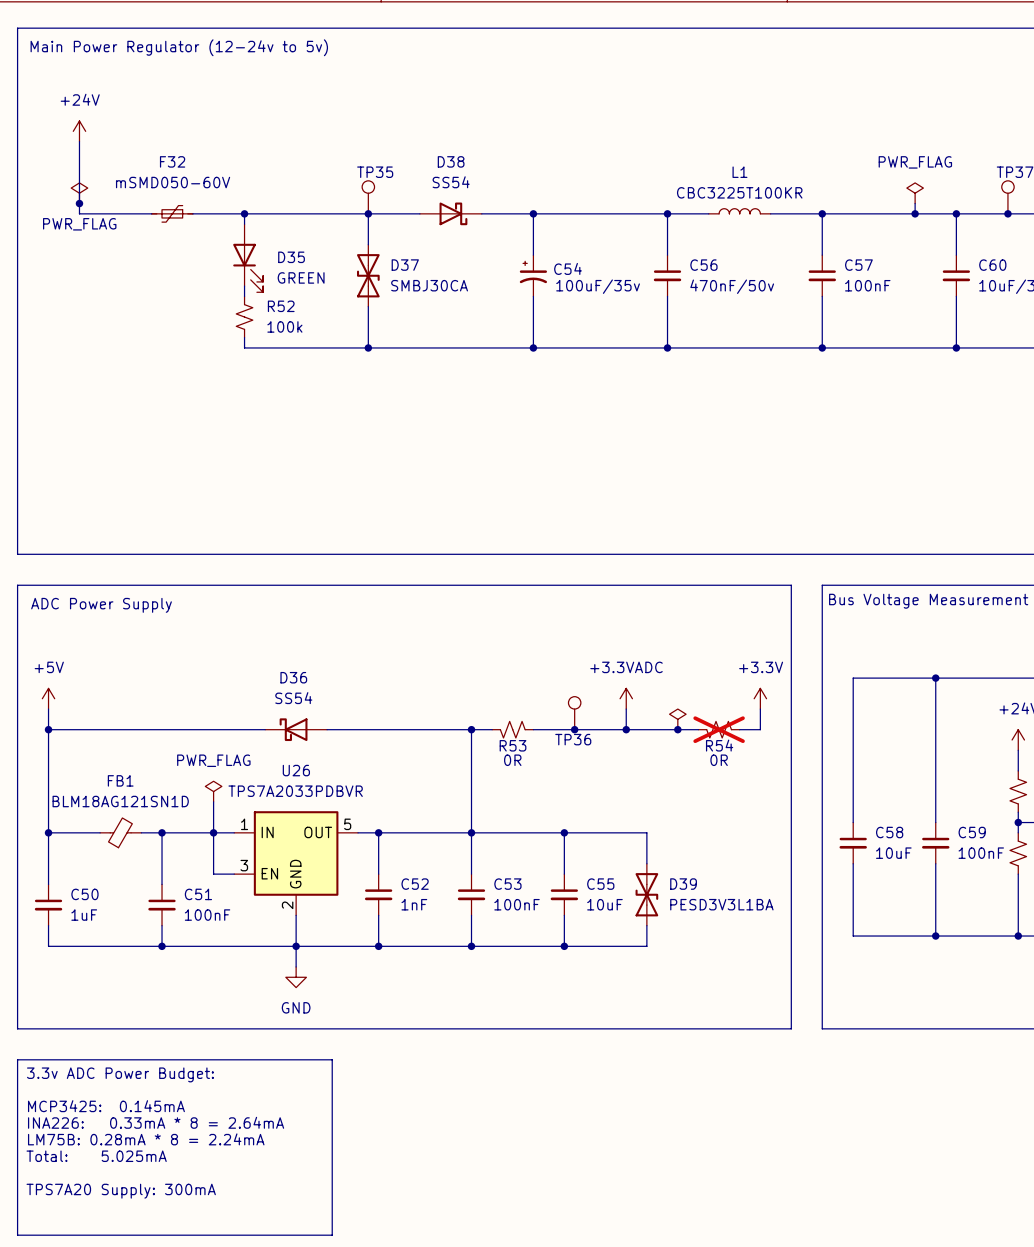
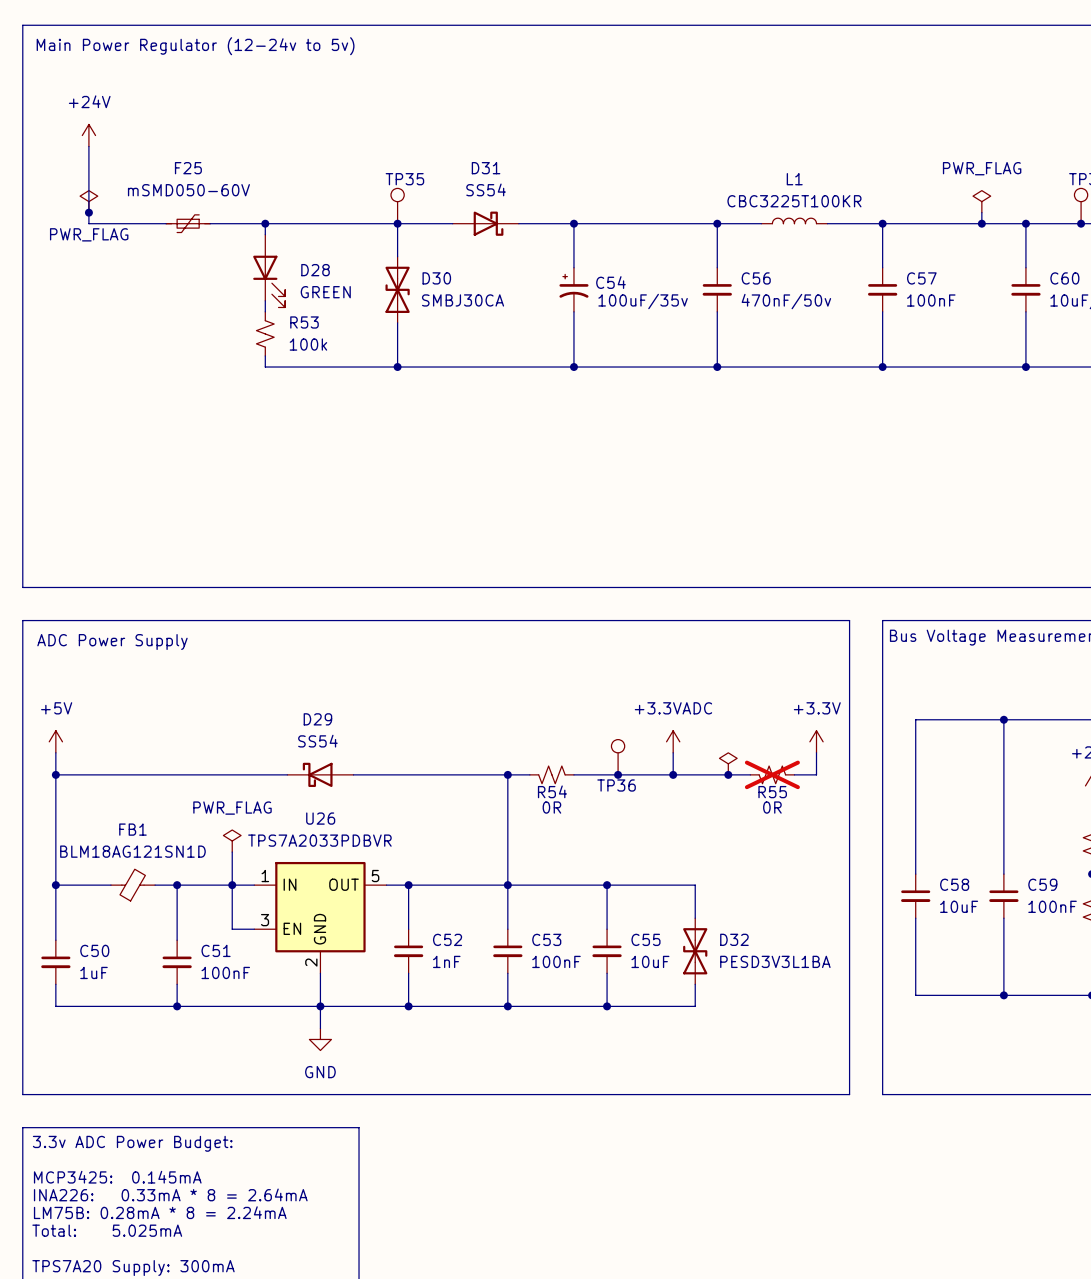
F32 name: F32 (172, 161) -> F25 (188, 168)
D38 name: D38 (451, 161) -> D31 (486, 168)
D35 name: D35 (291, 257) -> D28 (315, 270)
D37 name: D37 (405, 265) -> D30 (436, 278)
R52 name: R52 (281, 306) -> R53 (304, 322)
D36 name: D36 (293, 677) -> D29 (317, 719)
R53 name: R53 (513, 745) -> R54 (552, 791)
R54 name: R54 (719, 745) -> R55 (772, 792)
D39 name: D39 (683, 884) -> D32 (734, 939)

